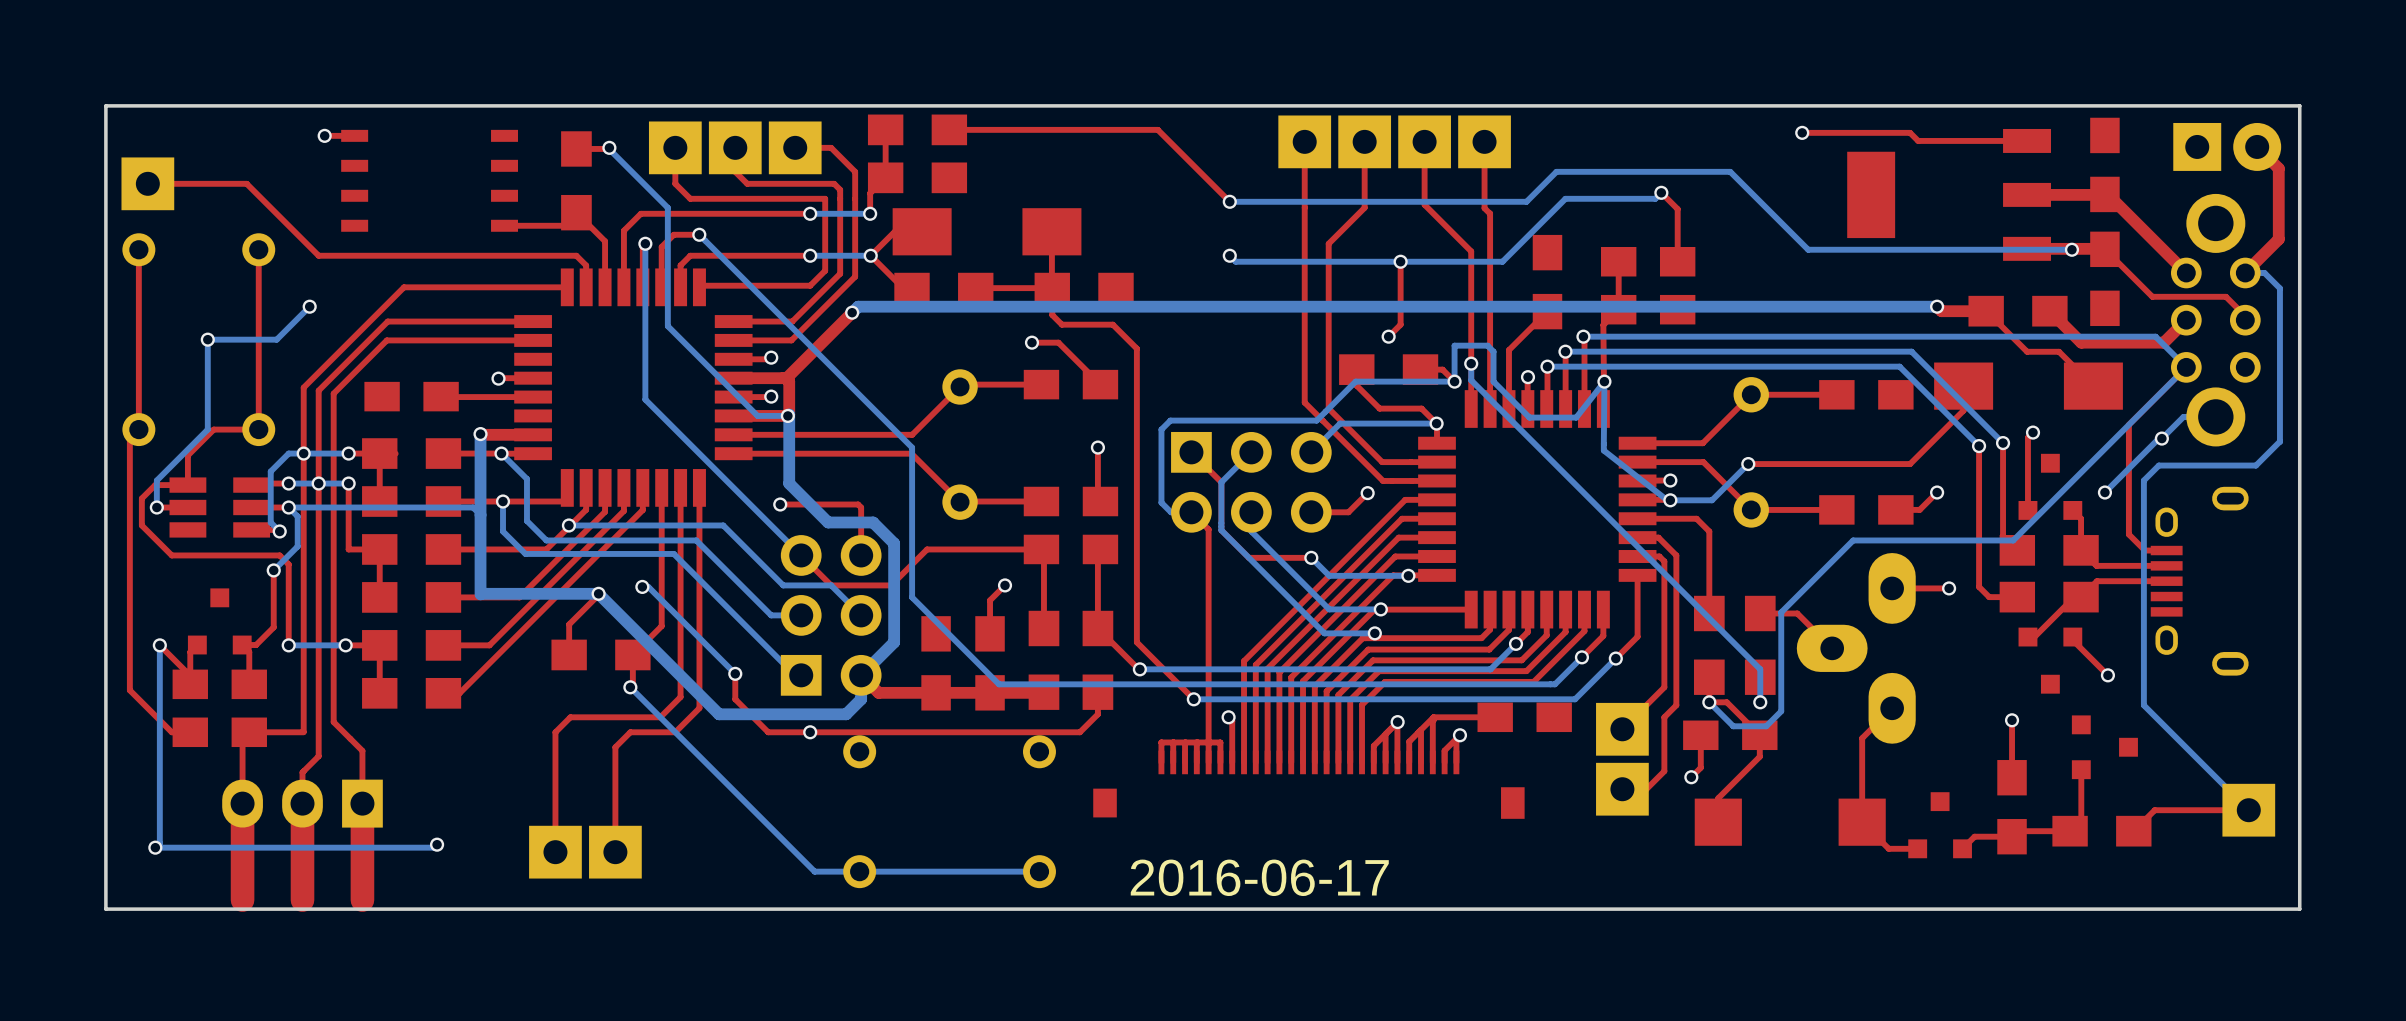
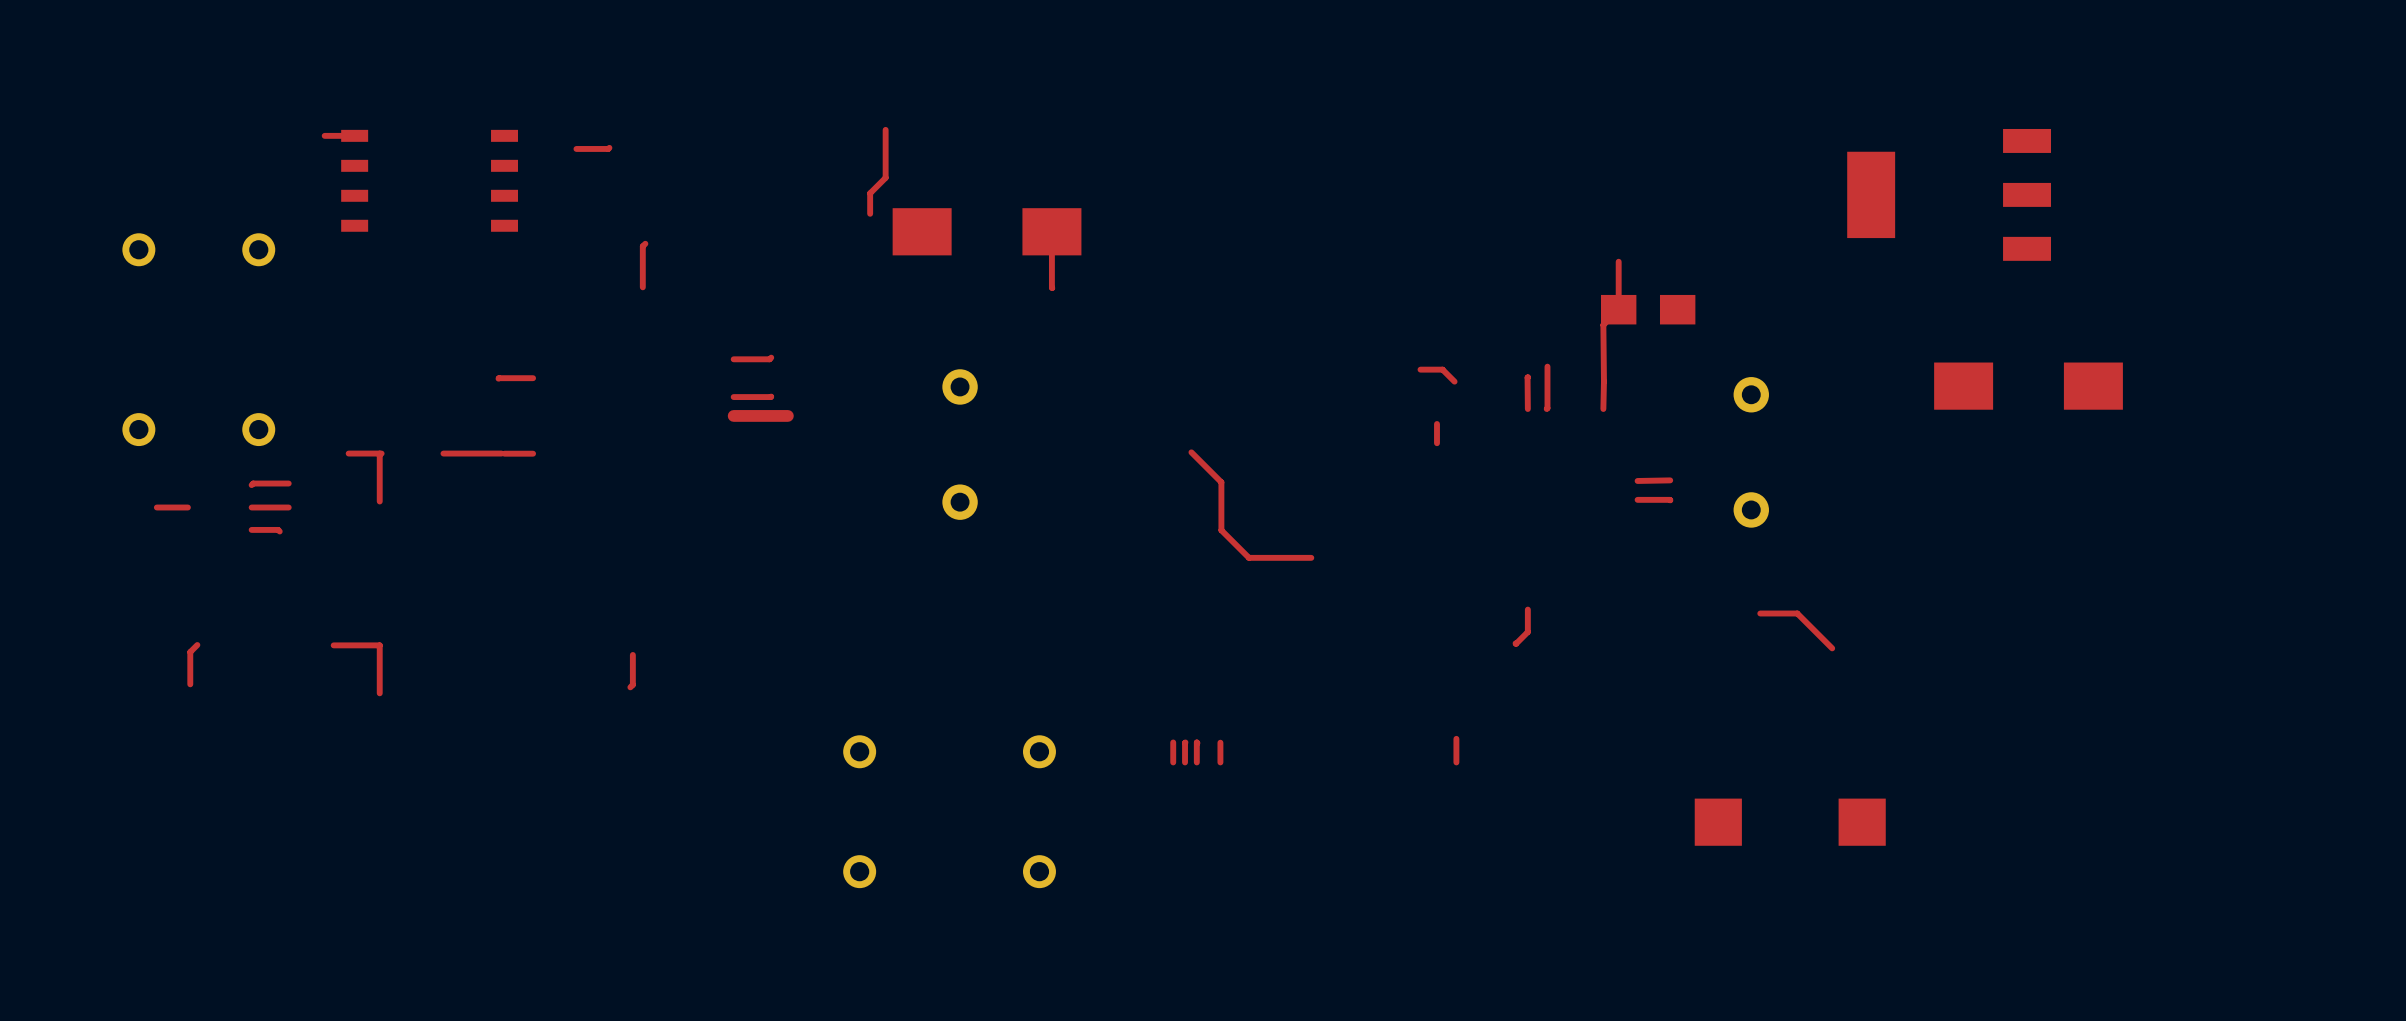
board edge: (2299, 105) (2299, 909) (105, 909) (105, 105) (2299, 105) -> none
part: (917, 129) -> none
top track: (949, 129) (1157, 129) (1229, 201) -> none
top track: (1802, 132) (1910, 132) (1918, 140) (2027, 140) -> none
via: (1802, 132) -> none
via: (324, 135) -> none
top track: (1304, 141) (1304, 402) (1383, 480) (1437, 480) -> none
part: (1304, 141) -> none
top track: (1364, 141) (1364, 207) (1328, 243) (1328, 408) (1382, 462) (1437, 462) -> none
part: (1364, 141) -> none
top track: (1424, 141) (1424, 204) (1471, 251) (1471, 409) -> none
part: (1424, 141) -> none
top track: (1484, 141) (1484, 208) (1490, 213) -> none
part: (1484, 141) -> none
part: (2227, 146) -> none
bottom track: (609, 147) (667, 207) (667, 326) (757, 415) (789, 414) (789, 483) (828, 522) (873, 522) (894, 543) (894, 642) (861, 675) (861, 699) (846, 714) (719, 714) (598, 593) (481, 593) -> none
via: (609, 147) -> none
top track: (675, 147) (675, 183) (690, 198) (825, 198) (825, 270) (810, 285) (699, 285) (699, 287) -> none
part: (675, 147) -> none
top track: (735, 147) (735, 171) (747, 183) (834, 183) (840, 189) (840, 273) (792, 321) (733, 321) -> none
part: (735, 147) -> none
top track: (795, 147) (831, 147) (855, 171) (855, 276) (791, 340) (733, 340) -> none
part: (795, 147) -> none
top track: (2257, 148) (2278, 168) (2278, 239) (2245, 272) -> none
part: (2104, 164) -> none
part: (917, 177) -> none
part: (576, 180) -> none
top track: (147, 183) (246, 183) (318, 255) (576, 255) (586, 265) (586, 287) -> none
part: (147, 183) -> none
top track: (1661, 192) (1677, 209) (1677, 261) -> none
bottom track: (1661, 192) (1655, 198) (1565, 198) (1502, 261) (1235, 261) (1229, 255) -> none
via: (1661, 192) -> none
top track: (2027, 194) (2107, 194) (2186, 272) (2183, 272) -> none
bottom track: (1229, 201) (1526, 201) (1556, 171) (1730, 171) (1808, 249) (2071, 249) -> none
via: (1229, 201) -> none
top track: (810, 213) (640, 213) (623, 230) (623, 287) -> none
via: (810, 213) -> none
bottom track: (870, 213) (810, 213) -> none
via: (870, 213) -> none
top track: (1490, 213) (1490, 409) -> none
top track: (504, 225) (563, 225) (576, 212) (605, 241) (605, 287) -> none
top track: (922, 231) (894, 231) (870, 255) (903, 288) (912, 288) -> none
top track: (699, 234) (673, 234) (661, 246) (661, 287) -> none
bottom track: (699, 234) (912, 447) (912, 597) (999, 684) (1554, 684) (1581, 657) -> none
via: (699, 234) -> none
bottom track: (645, 243) (645, 399) (795, 549) -> none
via: (645, 243) -> none
top track: (2027, 248) (2104, 248) (2152, 296) (2226, 296) (2245, 316) (2245, 320) -> none
top track: (138, 249) (138, 429) (129, 438) (129, 690) (171, 732) (190, 732) -> none
top track: (258, 249) (258, 429) (213, 429) (187, 455) (187, 485) (155, 485) (141, 498) (141, 525) (171, 555) (279, 555) (288, 564) (288, 645) -> none
via: (2071, 249) -> none
top track: (810, 255) (690, 255) (680, 265) (680, 287) -> none
via: (810, 255) -> none
bottom track: (870, 255) (810, 255) -> none
via: (870, 255) -> none
via: (1229, 255) -> none
top track: (1400, 261) (1400, 324) (1388, 336) -> none
via: (1400, 261) -> none
part: (1648, 261) -> none
bottom track: (2245, 272) (2264, 272) (2279, 288) (2279, 441) -> none
part: (2104, 278) -> none
part: (1547, 282) -> none
top track: (567, 287) (404, 287) (303, 387) (303, 731) -> none
part: (943, 288) -> none
top track: (975, 288) (1052, 288) (1052, 315) (1061, 324) (1112, 324) (1136, 348) (1136, 642) (1193, 699) -> none
part: (1084, 288) -> none
bottom track: (309, 306) (276, 339) (207, 339) (207, 429) (156, 480) (156, 507) -> none
via: (309, 306) -> none
top track: (1937, 306) (1941, 311) (1986, 311) -> none
bottom track: (1937, 306) (858, 306) (852, 312) -> none
via: (1937, 306) -> none
top track: (1986, 310) (2027, 351) (2059, 351) (2093, 386) -> none
top track: (1547, 311) (1508, 350) (1508, 409) -> none
part: (2018, 311) -> none
top track: (2049, 311) (2081, 342) (2163, 342) (2186, 320) -> none
top track: (852, 312) (786, 378) (733, 378) -> none
via: (852, 312) -> none
part: (2215, 320) -> none
top track: (533, 321) (387, 321) (318, 390) (318, 756) (302, 772) (302, 900) -> none
via: (1388, 336) -> none
top track: (1583, 336) (1584, 409) -> none
bottom track: (1583, 336) (2155, 336) (2186, 367) (2013, 540) (1853, 540) (1781, 612) (1781, 711) (1766, 726) (1733, 726) (1709, 702) -> none
via: (1583, 336) -> none
via: (207, 339) -> none
top track: (533, 340) (386, 340) (333, 393) (333, 722) (362, 750) (362, 900) -> none
top track: (1031, 342) (1058, 342) (1100, 384) -> none
via: (1031, 342) -> none
top track: (1565, 351) (1565, 409) -> none
bottom track: (1565, 351) (1911, 351) (2003, 443) -> none
via: (1565, 351) -> none
via: (771, 357) -> none
via: (1471, 363) -> none
bottom track: (1472, 363) (1471, 380) (1760, 669) (1760, 702) -> none
bottom track: (1547, 366) (1899, 366) (1979, 446) -> none
via: (1547, 366) -> none
top track: (2186, 367) (2128, 424) (2128, 534) (2144, 550) (2166, 550) -> none
top track: (1356, 369) (1356, 385) (1379, 408) (1421, 408) (1436, 423) -> none
part: (1388, 369) -> none
via: (1528, 377) -> none
via: (498, 378) -> none
top track: (785, 378) (789, 381) (789, 414) -> none
via: (1454, 381) -> none
via: (1604, 381) -> none
top track: (1041, 384) (962, 384) (912, 434) (733, 434) -> none
part: (1070, 384) -> none
top track: (1963, 386) (1963, 410) (1910, 464) (1748, 464) -> none
part: (633, 387) -> none
top track: (1836, 394) (1751, 394) (1702, 443) (1637, 443) -> none
part: (1866, 394) -> none
top track: (438, 395) (440, 397) (533, 397) -> none
part: (411, 396) -> none
via: (771, 396) -> none
via: (787, 415) -> none
bottom track: (2215, 416) (2183, 416) (2104, 492) -> none
bottom track: (1436, 423) (1340, 423) (1311, 452) -> none
via: (1436, 423) -> none
top track: (2033, 432) (2027, 437) (2027, 510) -> none
via: (2033, 432) -> none
bottom track: (480, 434) (480, 594) -> none
via: (480, 434) -> none
top track: (533, 434) (481, 434) -> none
via: (2161, 438) -> none
bottom track: (2279, 441) (2255, 465) (2158, 465) (2143, 480) (2143, 705) (2248, 810) -> none
top track: (2003, 443) (2003, 536) (2017, 550) -> none
via: (2003, 443) -> none
top track: (1979, 446) (1979, 586) (1989, 597) (2017, 597) -> none
via: (1979, 446) -> none
top track: (1097, 447) (1097, 498) (1100, 501) -> none
via: (1097, 447) -> none
bottom track: (1251, 452) (1221, 482) (1221, 530) (1324, 633) (1374, 633) -> none
via: (303, 453) -> none
bottom track: (348, 453) (288, 453) (270, 471) (270, 522) (279, 531) -> none
via: (348, 453) -> none
part: (411, 453) -> none
bottom track: (501, 453) (526, 479) (526, 520) (546, 540) (696, 540) (771, 615) (801, 615) -> none
via: (501, 453) -> none
top track: (733, 453) (911, 453) (960, 502) (1041, 501) -> none
top track: (1637, 462) (1703, 462) (1751, 509) (1836, 509) -> none
bottom track: (1748, 464) (1712, 500) (1667, 500) (1603, 450) (1604, 381) (1576, 417) (1529, 417) (1493, 381) (1493, 351) (1487, 345) (1454, 345) (1454, 381) (1355, 381) (1316, 420) (1170, 420) (1161, 429) (1161, 502) (1171, 512) (1191, 512) -> none
via: (1748, 464) -> none
via: (1670, 480) -> none
part: (1251, 482) -> none
via: (288, 483) -> none
via: (318, 483) -> none
top track: (348, 483) (348, 549) (379, 549) (379, 597) -> none
bottom track: (348, 483) (288, 483) -> none
via: (348, 483) -> none
part: (2050, 486) -> none
top track: (586, 487) (586, 509) (546, 549) (443, 549) -> none
top track: (605, 487) (605, 511) (519, 597) (443, 597) -> none
top track: (623, 487) (623, 510) (489, 645) (443, 645) -> none
top track: (642, 487) (642, 510) (459, 693) (443, 693) -> none
top track: (661, 487) (661, 626) (630, 656) -> none
top track: (680, 487) (680, 697) (660, 717) (570, 717) (555, 732) (555, 852) -> none
top track: (699, 487) (699, 708) (675, 732) (630, 732) (615, 747) (615, 852) -> none
top track: (1937, 492) (1919, 509) (1895, 509) -> none
via: (1937, 492) -> none
via: (2104, 492) -> none
top track: (1367, 493) (1348, 512) (1311, 512) -> none
via: (1367, 493) -> none
top track: (1437, 499) (1405, 499) (1244, 661) (1244, 762) -> none
via: (1670, 500) -> none
part: (411, 501) -> none
via: (503, 501) -> none
bottom track: (506, 501) (503, 501) (503, 531) (525, 553) (673, 553) (795, 675) (801, 675) (801, 679) -> none
top track: (567, 501) (443, 501) -> none
part: (1070, 501) -> none
top track: (780, 504) (858, 504) (861, 507) (861, 555) -> none
via: (780, 504) -> none
via: (156, 507) -> none
part: (219, 507) -> none
via: (288, 507) -> none
part: (1537, 509) -> none
part: (1866, 509) -> none
top track: (2072, 510) (2081, 518) (2081, 550) (2096, 565) (2166, 565) -> none
top track: (1191, 512) (1208, 529) (1208, 762) -> none
bottom track: (1251, 512) (1251, 531) (1329, 609) (1380, 609) -> none
bottom track: (480, 514) (473, 507) (288, 507) (297, 516) (297, 546) (273, 570) -> none
top track: (1437, 518) (1401, 518) (1255, 664) (1255, 762) -> none
top track: (1637, 518) (1696, 518) (1709, 531) (1709, 613) -> none
bottom track: (568, 525) (723, 525) (783, 585) (831, 585) (861, 615) -> none
via: (568, 525) -> none
via: (279, 531) -> none
top track: (1437, 537) (1398, 537) (1267, 668) (1267, 762) -> none
top track: (1637, 537) (1658, 537) (1676, 555) (1676, 705) (1664, 717) (1664, 771) (1646, 789) (1622, 789) -> none
part: (411, 549) -> none
part: (1070, 549) -> none
top track: (1100, 549) (1097, 551) (1097, 628) (1138, 669) -> none
part: (2049, 550) -> none
top track: (801, 555) (831, 585) (891, 585) (927, 549) (1041, 549) (1043, 551) (1043, 628) -> none
top track: (1437, 556) (1395, 556) (1279, 672) (1279, 762) -> none
top track: (1637, 556) (1659, 556) (1664, 561) (1664, 687) (1622, 729) -> none
bottom track: (1311, 557) (1329, 575) (1408, 575) -> none
via: (1311, 557) -> none
top track: (273, 570) (273, 627) (256, 645) (242, 645) (249, 652) (249, 684) -> none
via: (273, 570) -> none
via: (1408, 575) -> none
top track: (1437, 575) (1393, 575) (1291, 677) (1291, 762) -> none
top track: (1637, 575) (1637, 636) (1615, 658) -> none
top track: (2166, 581) (2096, 581) (2081, 597) (2074, 597) (2034, 637) (2027, 637) -> none
part: (2199, 581) -> none
top track: (1005, 585) (990, 600) (990, 633) -> none
via: (1005, 585) -> none
bottom track: (642, 586) (648, 586) (735, 673) -> none
via: (642, 586) -> none
top track: (1949, 588) (1892, 588) -> none
via: (1949, 588) -> none
via: (598, 593) -> none
top track: (598, 595) (569, 624) (569, 654) -> none
part: (411, 597) -> none
part: (2049, 597) -> none
via: (1380, 609) -> none
top track: (1471, 609) (1374, 609) (1303, 681) (1303, 762) -> none
top track: (1490, 609) (1490, 629) (1481, 638) (1362, 638) (1314, 686) (1314, 762) -> none
top track: (1508, 609) (1508, 629) (1489, 649) (1368, 649) (1326, 691) (1326, 762) -> none
top track: (1546, 609) (1546, 635) (1521, 660) (1373, 660) (1338, 694) (1338, 762) -> none
top track: (1565, 609) (1565, 632) (1526, 671) (1379, 671) (1350, 699) (1350, 762) -> none
top track: (1584, 609) (1584, 631) (1533, 681) (1385, 681) (1362, 704) (1362, 762) -> none
top track: (1603, 609) (1603, 635) (1581, 657) -> none
part: (831, 615) -> none
part: (219, 621) -> none
via: (1374, 633) -> none
top track: (2072, 637) (2072, 640) (2107, 675) -> none
bottom track: (1516, 643) (1490, 669) (1139, 669) -> none
via: (1516, 643) -> none
top track: (159, 645) (190, 675) -> none
bottom track: (159, 645) (159, 843) (155, 847) (434, 847) (437, 844) -> none
via: (159, 645) -> none
via: (288, 645) -> none
bottom track: (345, 645) (288, 645) -> none
via: (345, 645) -> none
part: (411, 645) -> none
part: (1709, 645) -> none
part: (1760, 645) -> none
part: (1856, 648) -> none
part: (601, 654) -> none
via: (1581, 657) -> none
bottom track: (1615, 658) (1575, 699) (1193, 699) -> none
via: (1615, 658) -> none
part: (1043, 660) -> none
part: (1097, 660) -> none
part: (2050, 660) -> none
part: (936, 663) -> none
part: (990, 663) -> none
via: (1139, 669) -> none
top track: (735, 673) (735, 699) (768, 732) (1079, 732) (1097, 714) (1097, 692) -> none
via: (735, 673) -> none
top track: (861, 675) (878, 692) (1043, 692) -> none
via: (2107, 675) -> none
top track: (1709, 677) (1709, 702) (1726, 702) (1759, 735) (1759, 756) (1718, 798) (1718, 822) -> none
part: (219, 684) -> none
bottom track: (630, 687) (814, 871) (1039, 871) -> none
via: (630, 687) -> none
part: (411, 693) -> none
via: (1193, 699) -> none
via: (1709, 702) -> none
via: (1760, 702) -> none
top track: (1892, 708) (1862, 738) (1862, 822) (1888, 848) (1917, 848) -> none
top track: (1228, 717) (1232, 720) (1232, 762) -> none
via: (1228, 717) -> none
top track: (1433, 717) (1409, 741) (1409, 762) -> none
top track: (1495, 717) (1433, 717) -> none
part: (1524, 717) -> none
top track: (1433, 718) (1432, 762) -> none
top track: (2012, 720) (2012, 777) -> none
via: (2012, 720) -> none
top track: (1397, 722) (1373, 745) (1373, 762) -> none
top track: (1397, 722) (1397, 762) -> none
via: (1397, 722) -> none
top track: (1421, 729) (1421, 762) -> none
part: (1622, 729) -> none
part: (219, 732) -> none
top track: (303, 732) (249, 732) (242, 739) (242, 900) -> none
via: (810, 732) -> none
top track: (1385, 734) (1385, 762) -> none
top track: (1459, 735) (1444, 750) (1444, 762) -> none
via: (1459, 735) -> none
top track: (1700, 735) (1700, 767) (1691, 777) -> none
part: (1730, 735) -> none
top track: (1220, 742) (1161, 742) (1161, 762) -> none
part: (2104, 747) -> none
top track: (2081, 769) (2081, 819) (2070, 831) (2017, 831) (2012, 836) (1974, 836) (1962, 848) -> none
via: (1691, 777) -> none
part: (1308, 784) -> none
part: (1622, 789) -> none
part: (302, 803) -> none
part: (2012, 807) -> none
top track: (2248, 810) (2154, 810) (2133, 831) -> none
part: (2248, 810) -> none
part: (1940, 825) -> none
part: (2101, 831) -> none
via: (437, 844) -> none
via: (155, 847) -> none
part: (555, 852) -> none
part: (615, 852) -> none
text: 2016-06-17 (1259, 877) -> none

